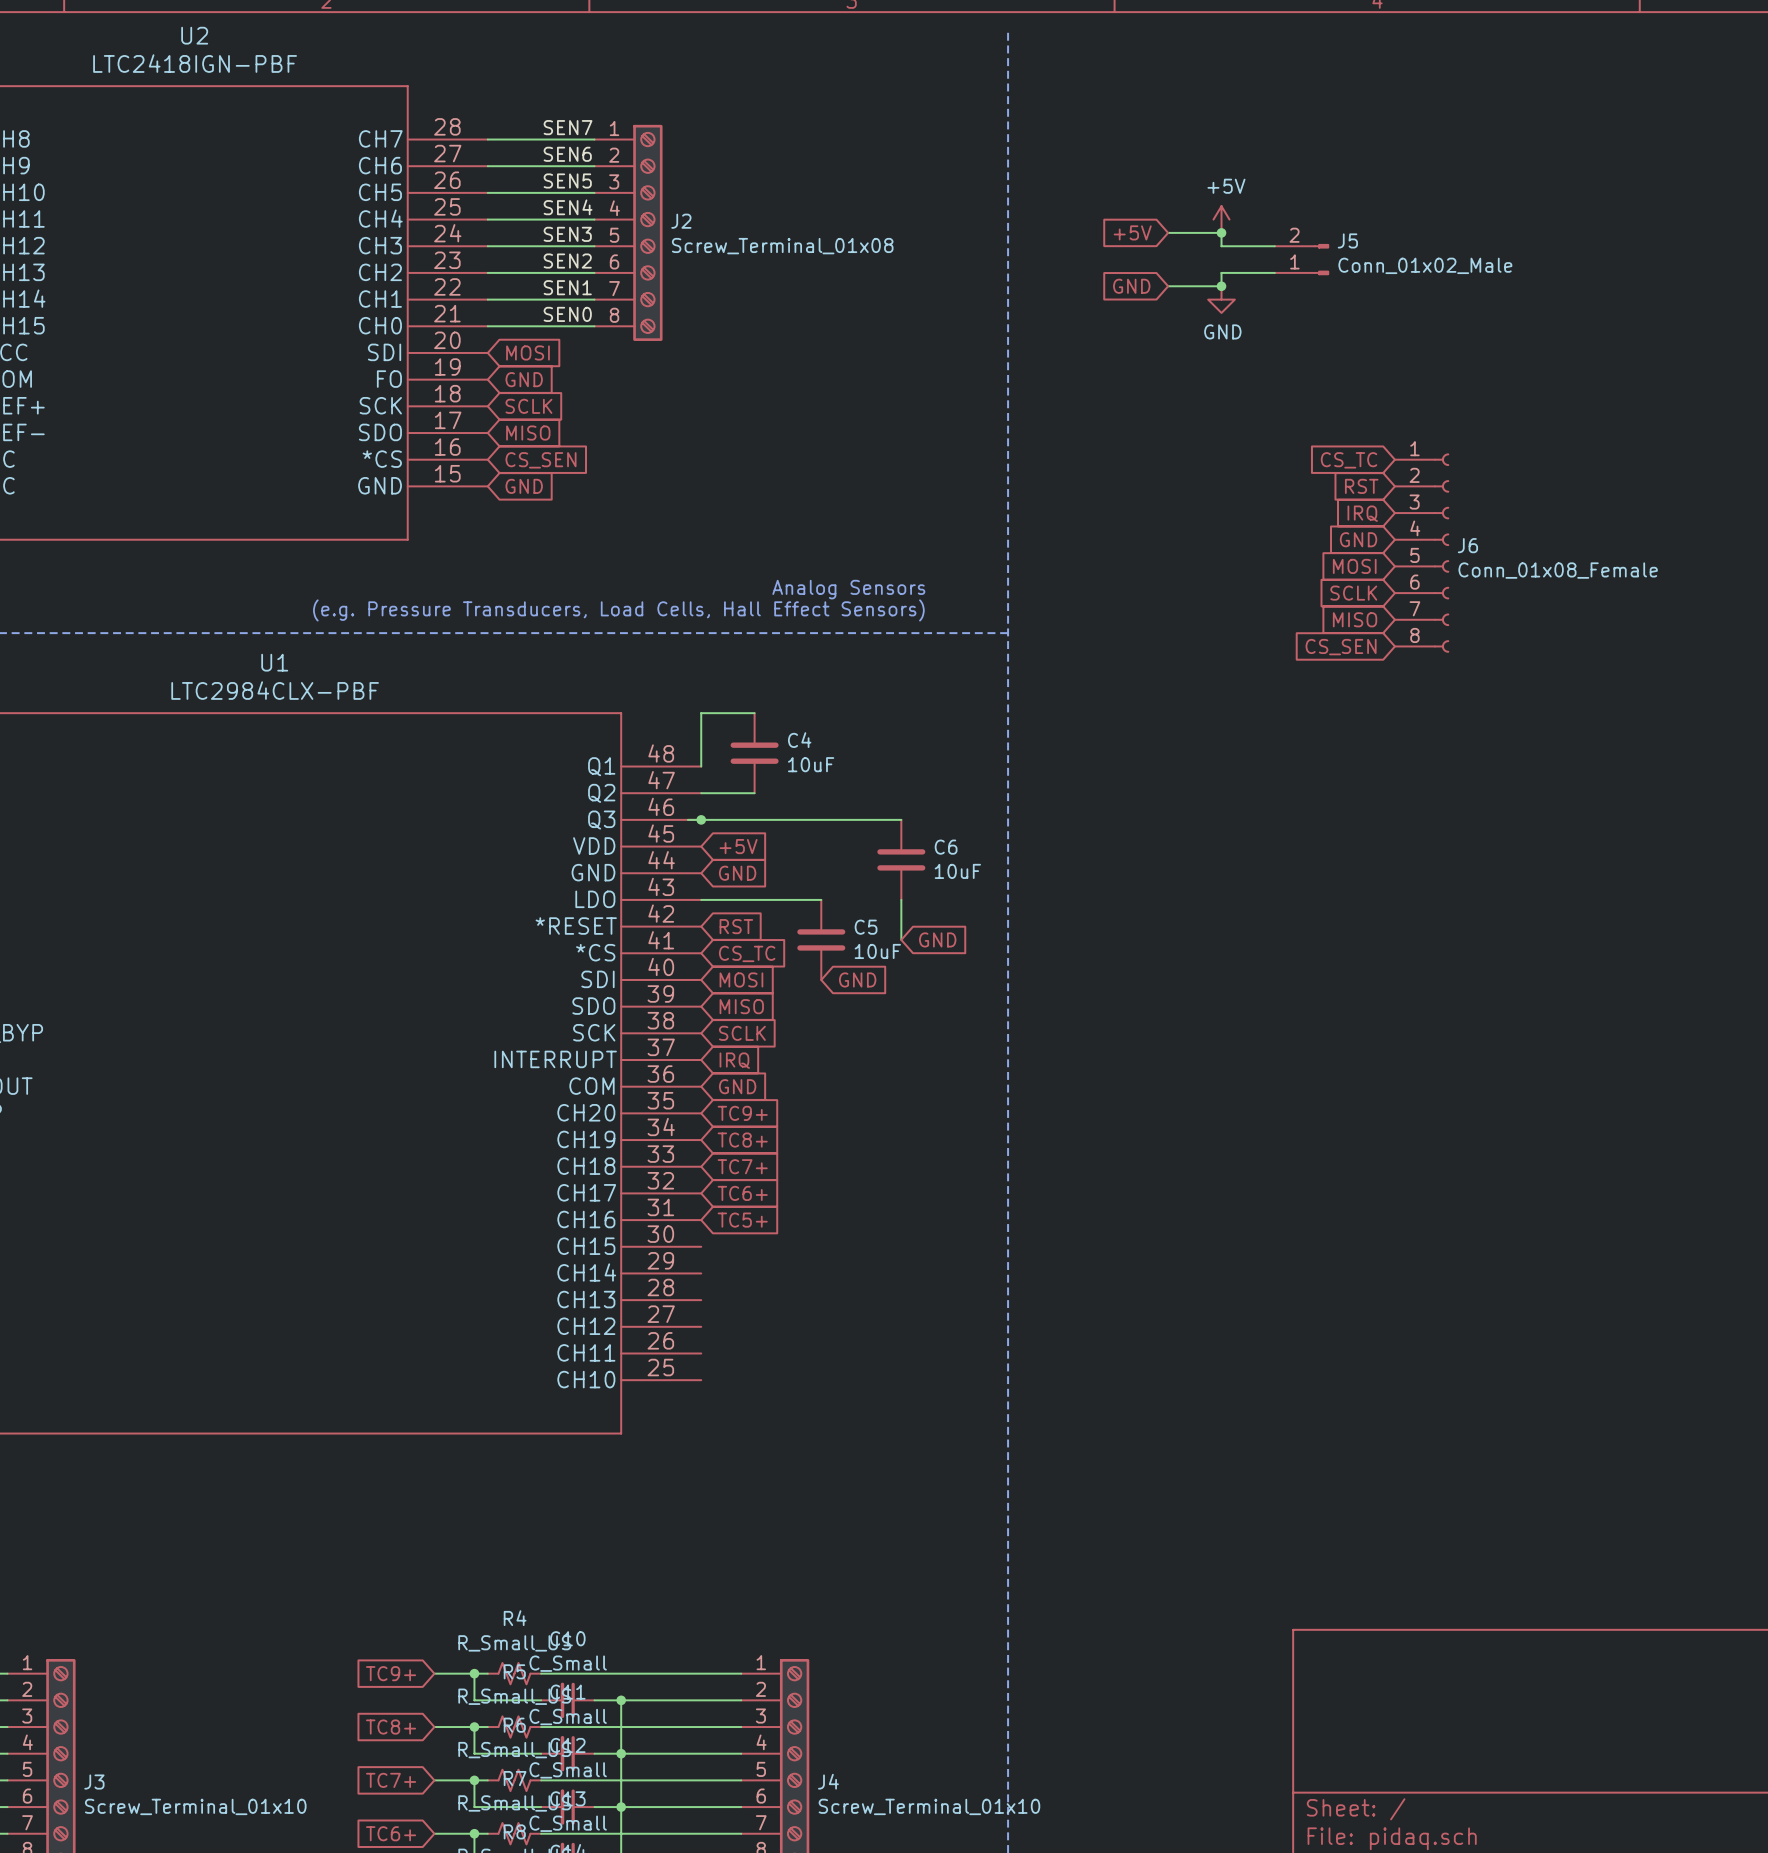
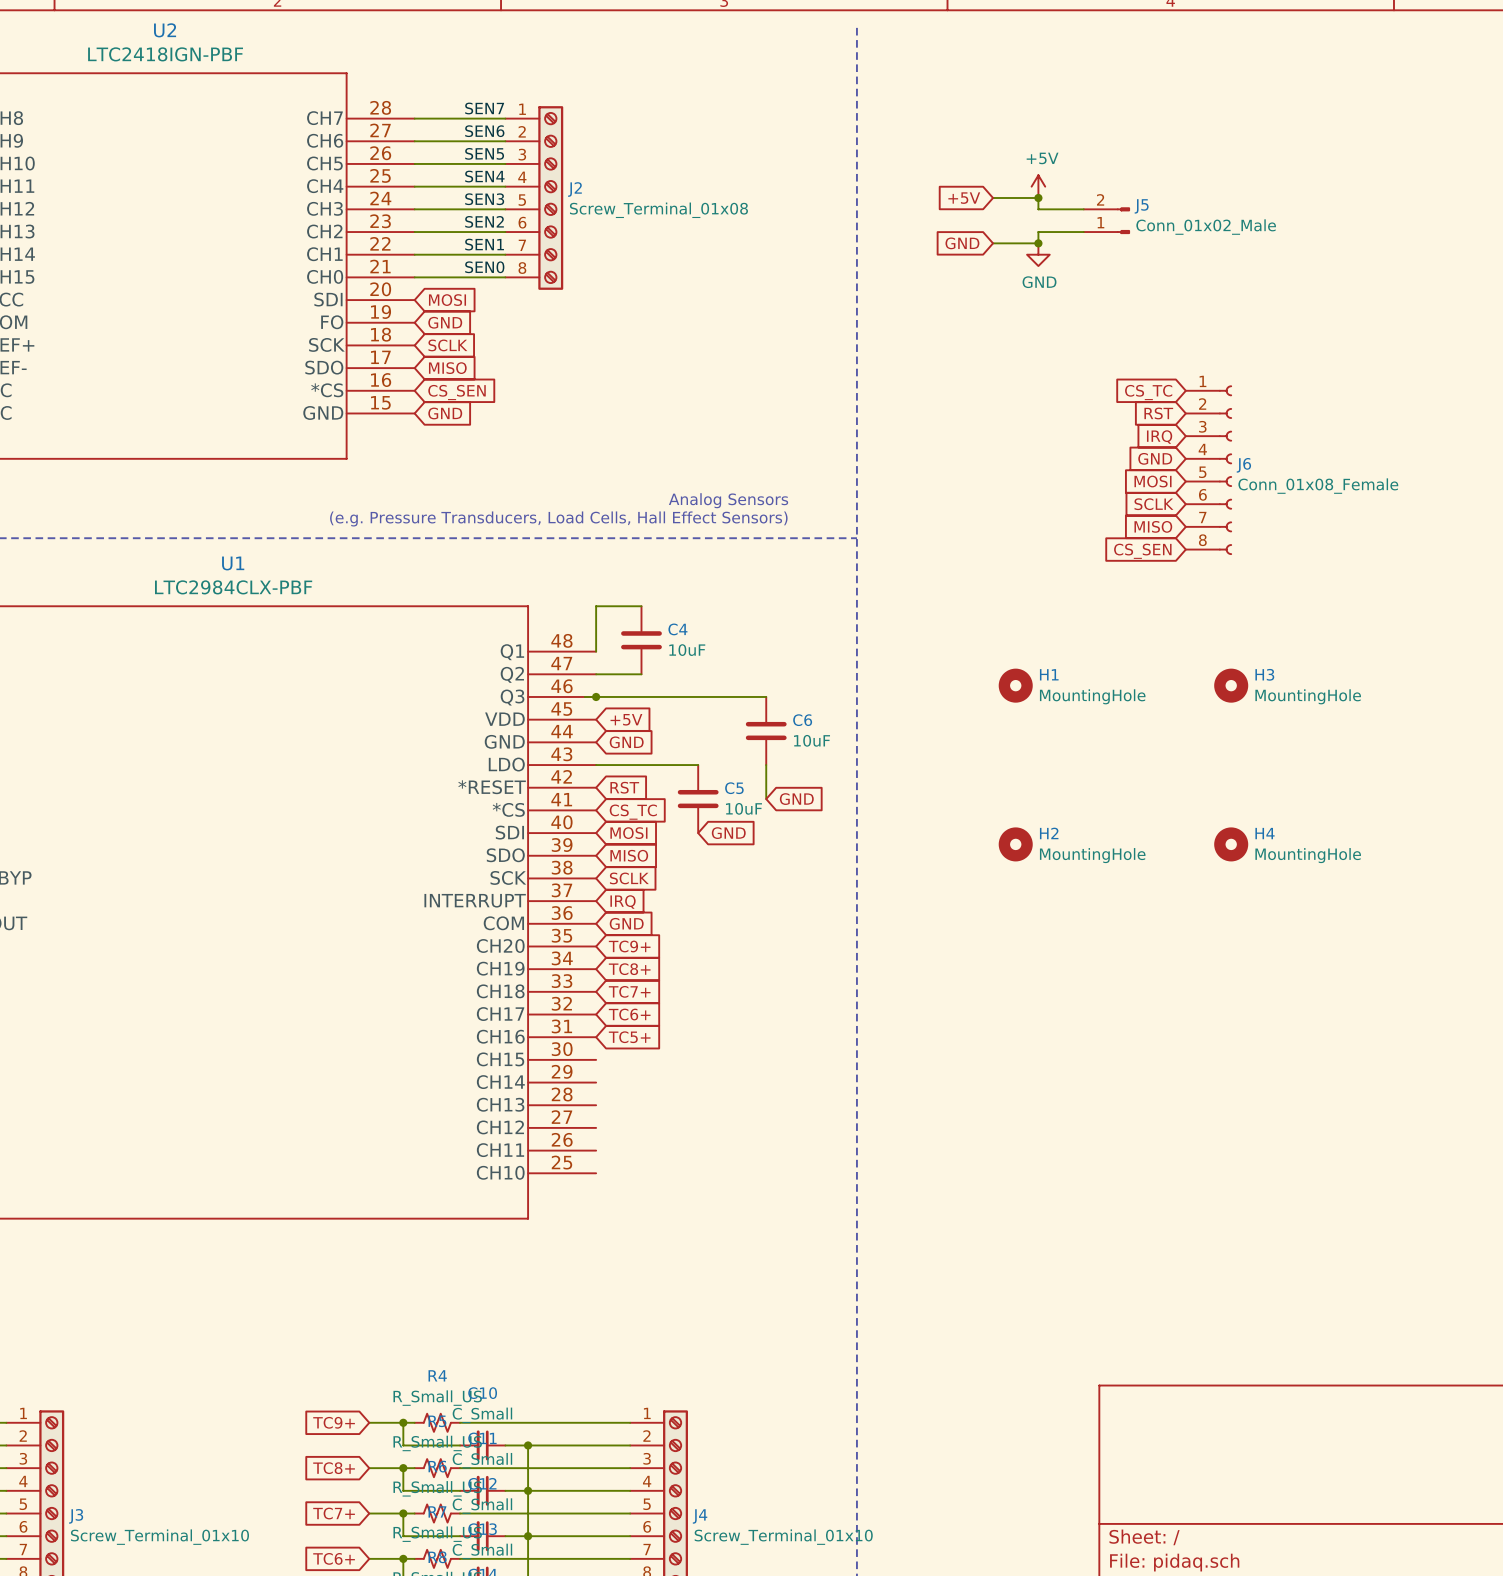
H1: none -> MountingHole (1015, 685)
H3: none -> MountingHole (1231, 685)
H2: none -> MountingHole (1015, 844)
H4: none -> MountingHole (1231, 844)

